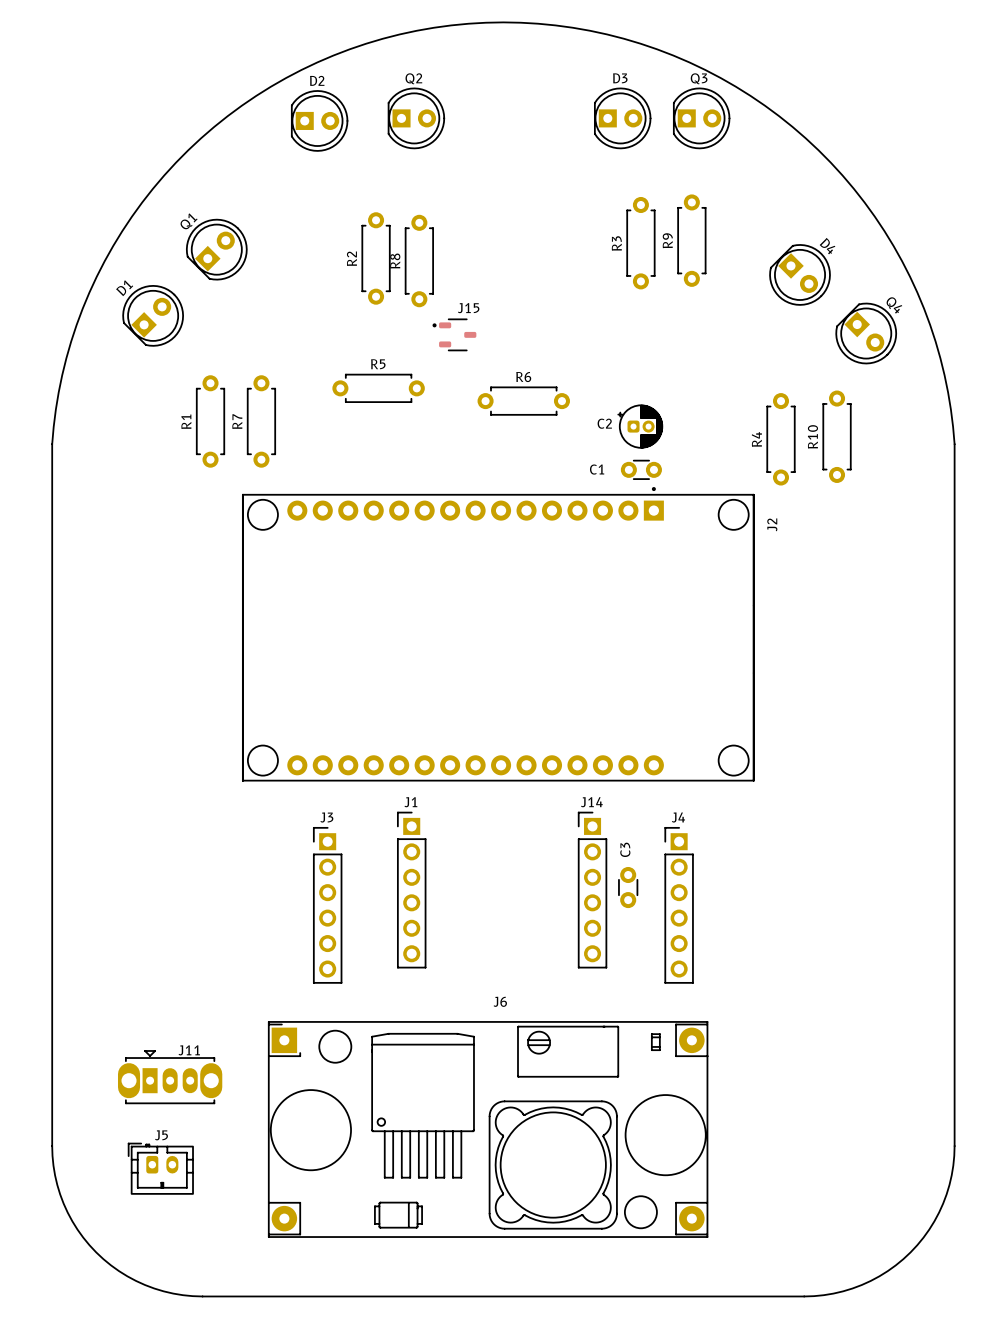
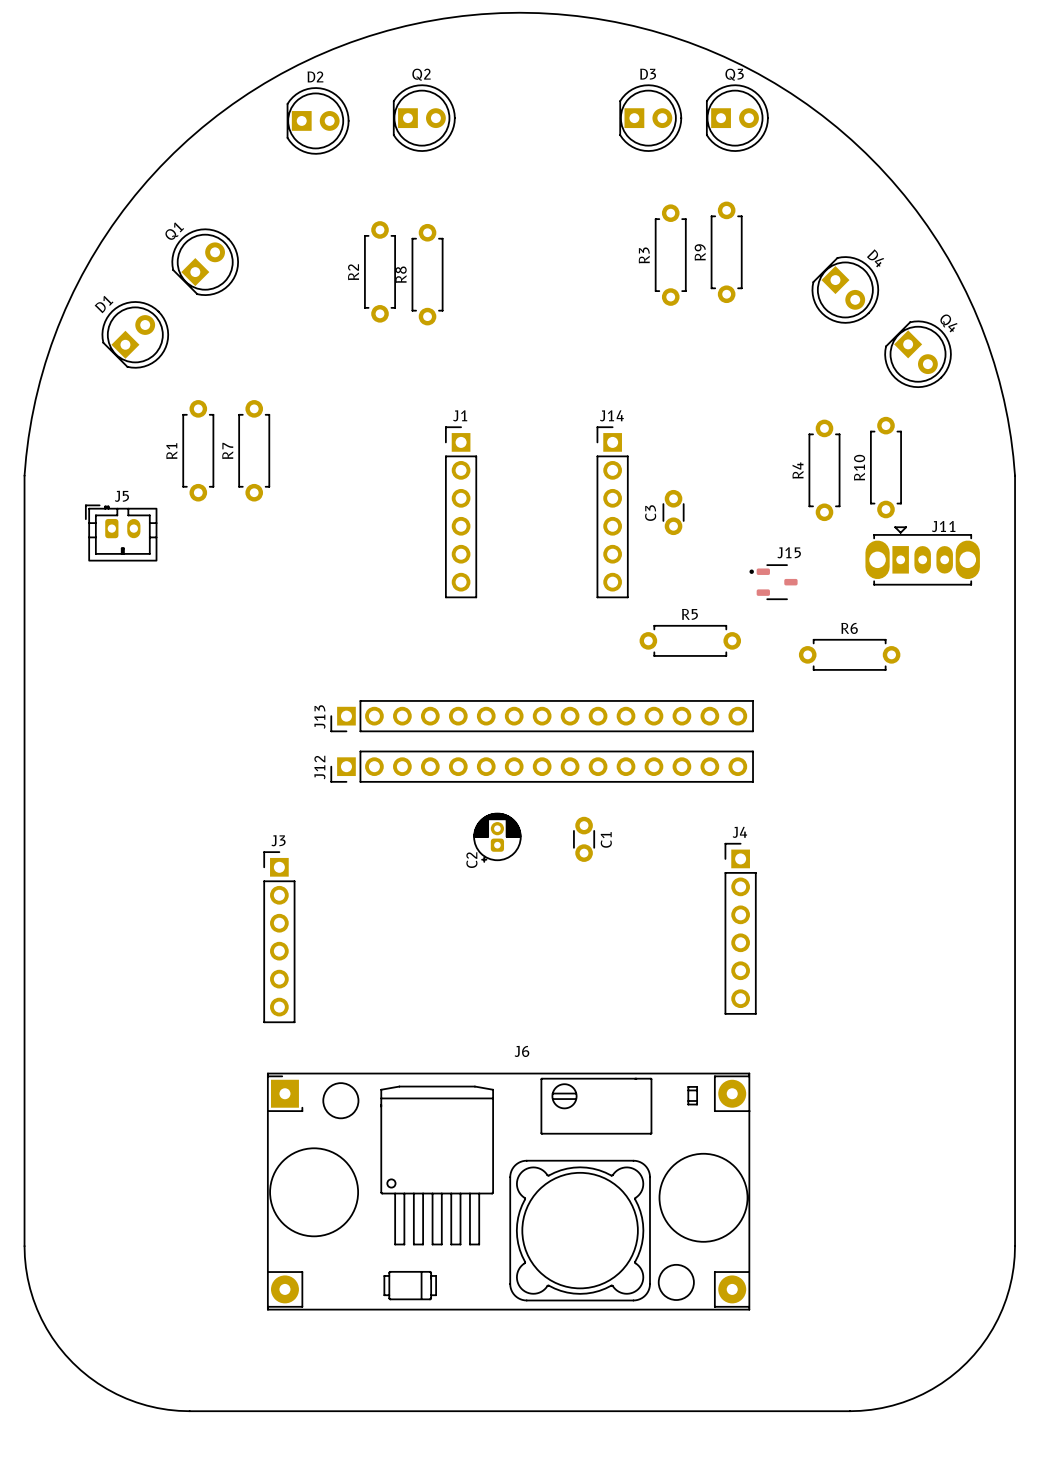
J15 position: (454, 334) -> (773, 582)
R5 position: (378, 388) -> (690, 640)
R6 position: (523, 401) -> (849, 654)
C2 name position: C2 (604, 423) -> C2 (471, 860)
C2 rotation: 0° (640, 426) -> 90° counterclockwise (497, 837)
C2 position: (640, 426) -> (497, 837)
C1 name position: C1 (597, 469) -> C1 (606, 839)
C1 rotation: 0° (641, 469) -> 90° clockwise (584, 839)
C1 position: (641, 469) -> (584, 839)
J2: (498, 634) -> none
J13: none -> (542, 716)
J12: none -> (542, 766)
C3 name position: C3 (625, 849) -> C3 (650, 513)
C3 position: (628, 887) -> (673, 512)
J1 position: (411, 890) -> (461, 512)
J14 position: (592, 890) -> (612, 512)
J3 position: (327, 905) -> (279, 937)
J4 position: (679, 905) -> (740, 928)
J11 position: (170, 1077) -> (922, 555)
J6 position: (488, 1129) -> (508, 1191)
J5 position: (160, 1168) -> (121, 533)

